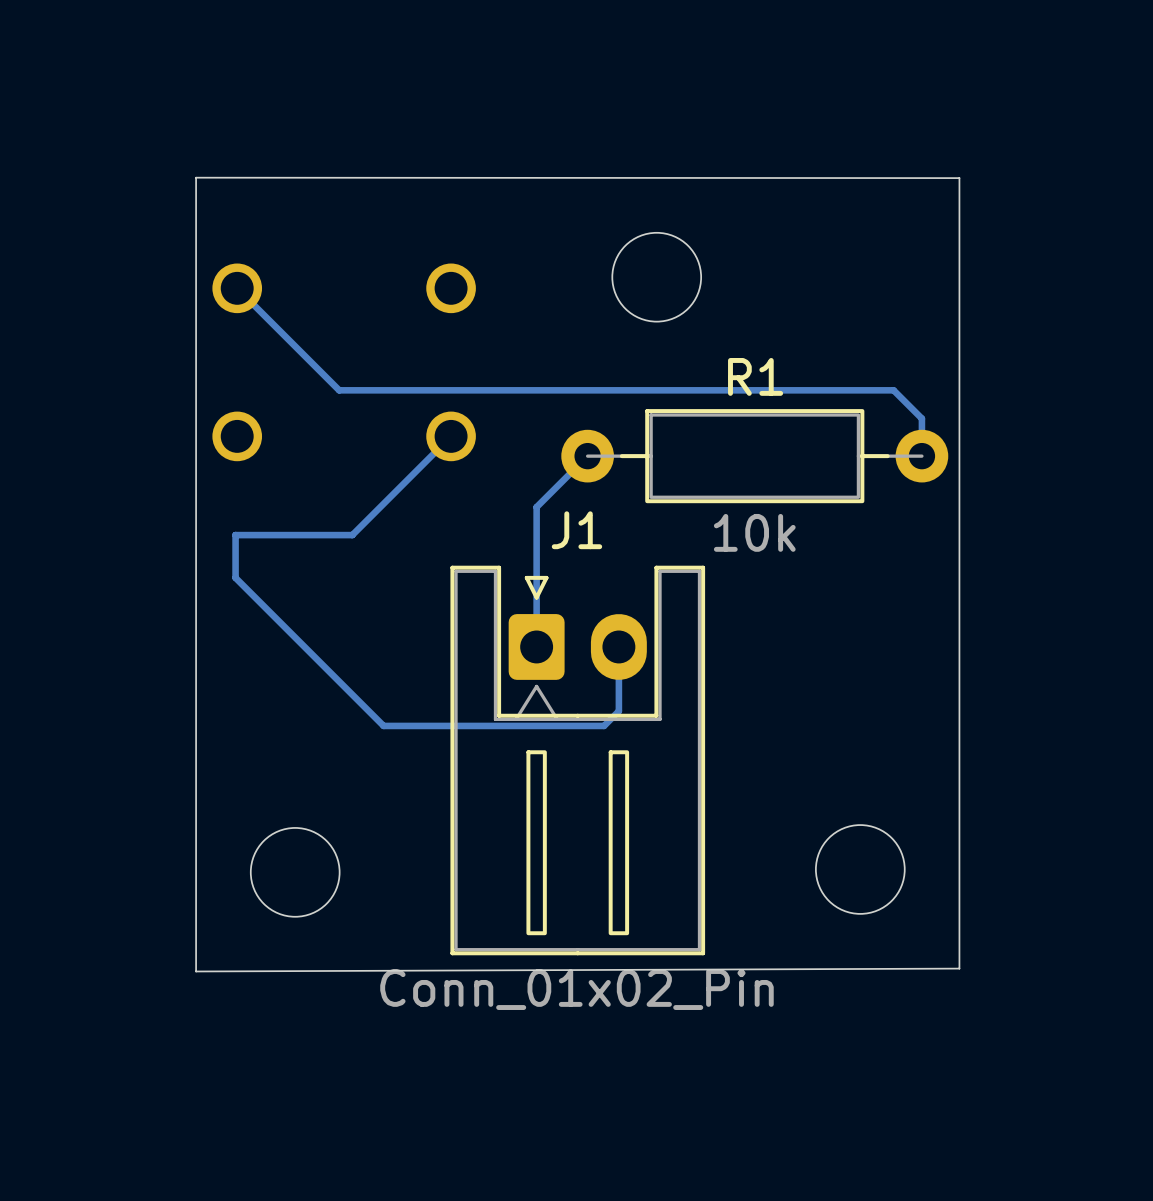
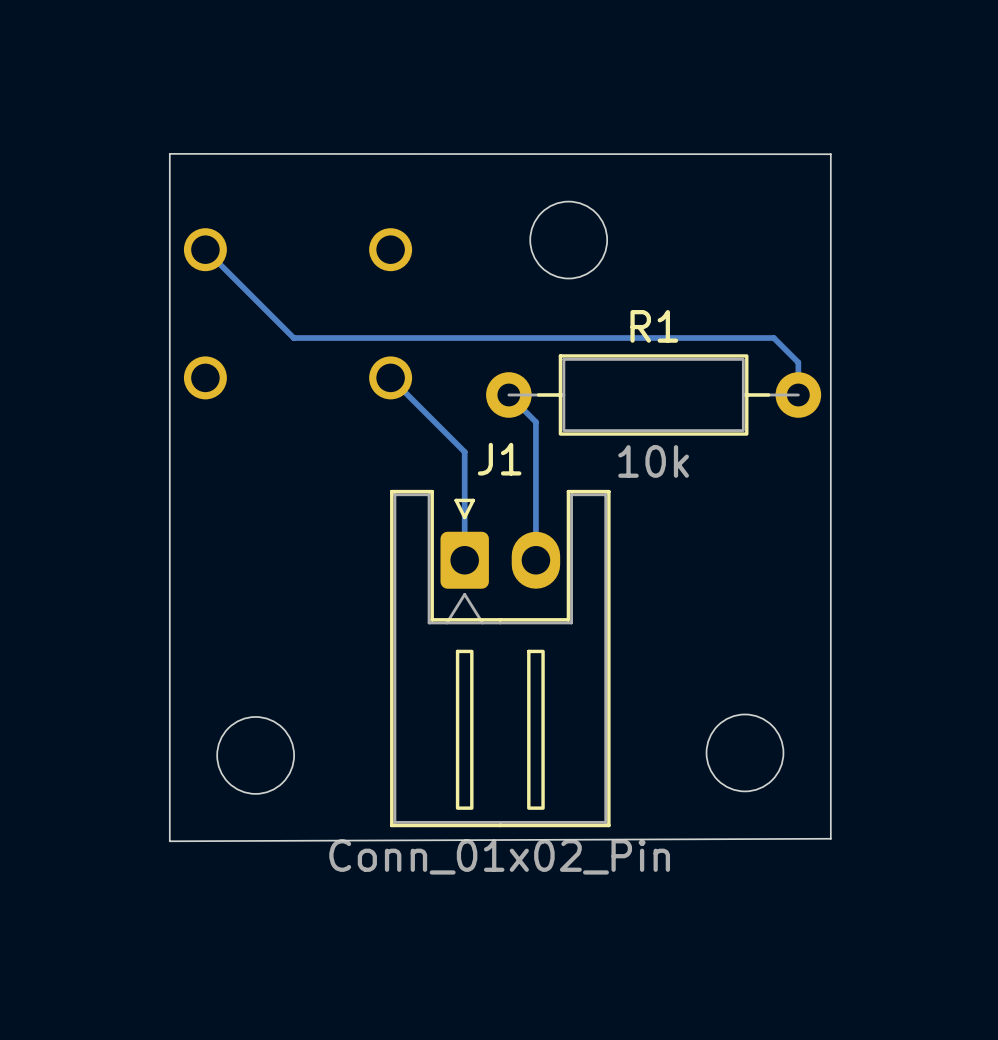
bottom track: (451, 436) (352, 535) (235, 535) (235, 577) (383, 725) (604, 725) (618, 711) (618, 646) -> (508, 394) (535, 422) (535, 560)
bottom track: (587, 456) (536, 507) (536, 521) -> (390, 377) (464, 451)

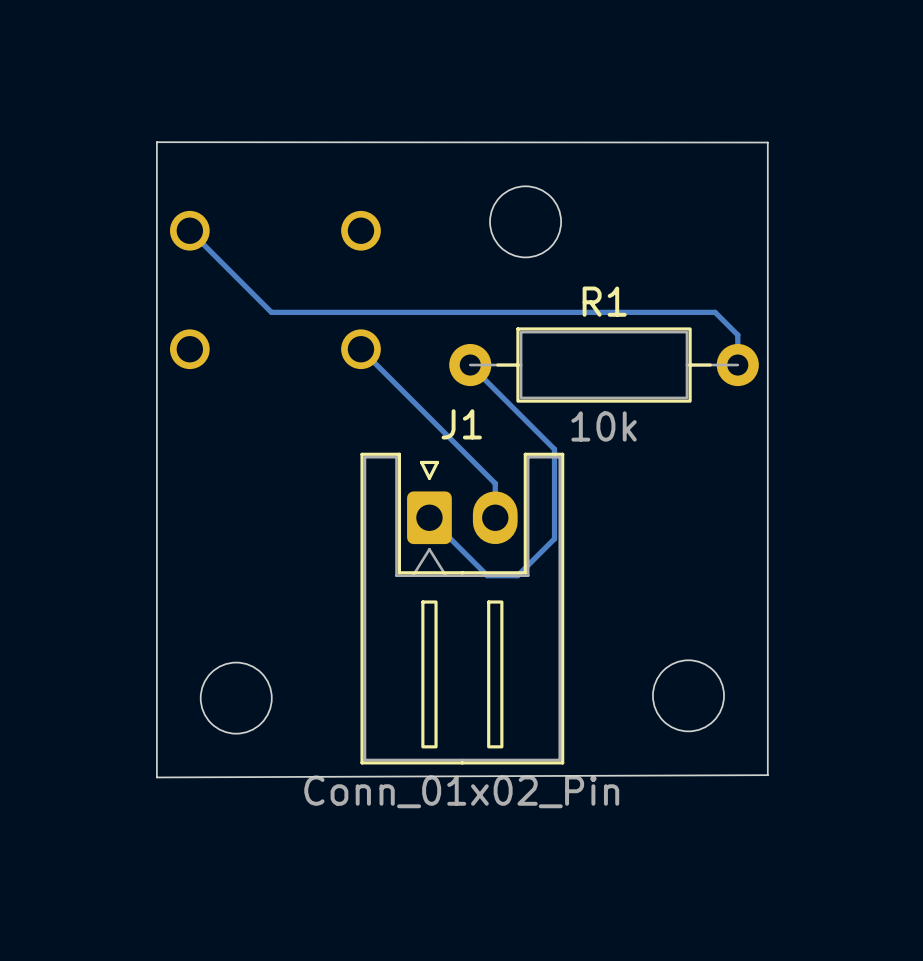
bottom track: (535, 422) (535, 523) -> (429, 417) (495, 483)
bottom track: (464, 451) (464, 560) -> (495, 390) (554, 449) (554, 538) (517, 575) (487, 575) (429, 517)

